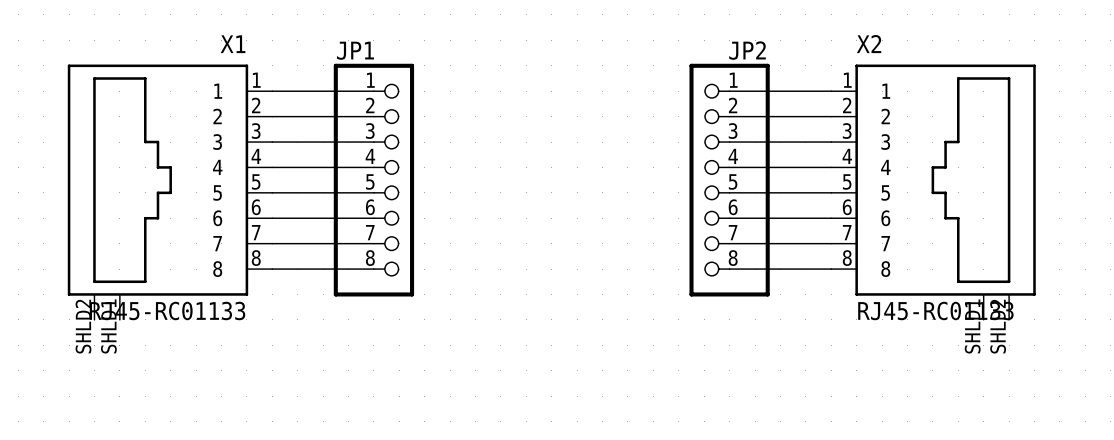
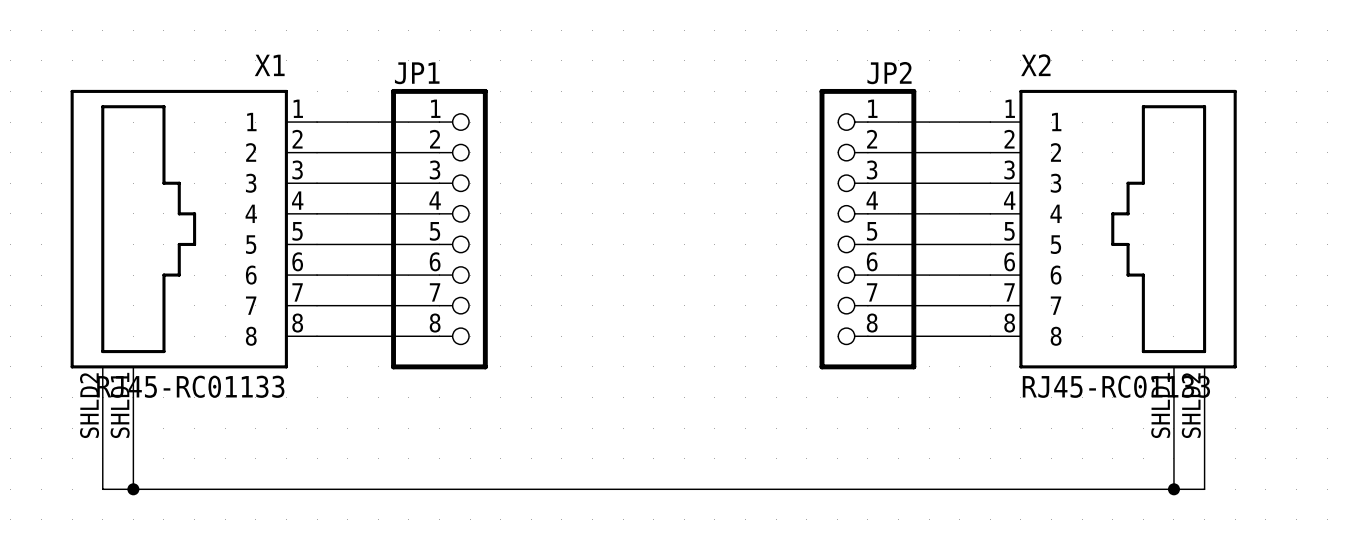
wire: none -> (102, 397) (102, 489) (1204, 489) (1204, 397)
wire: none -> (133, 397) (133, 489)
wire: none -> (1173, 397) (1173, 489)
junction: none -> (133, 489)
junction: none -> (1173, 489)

